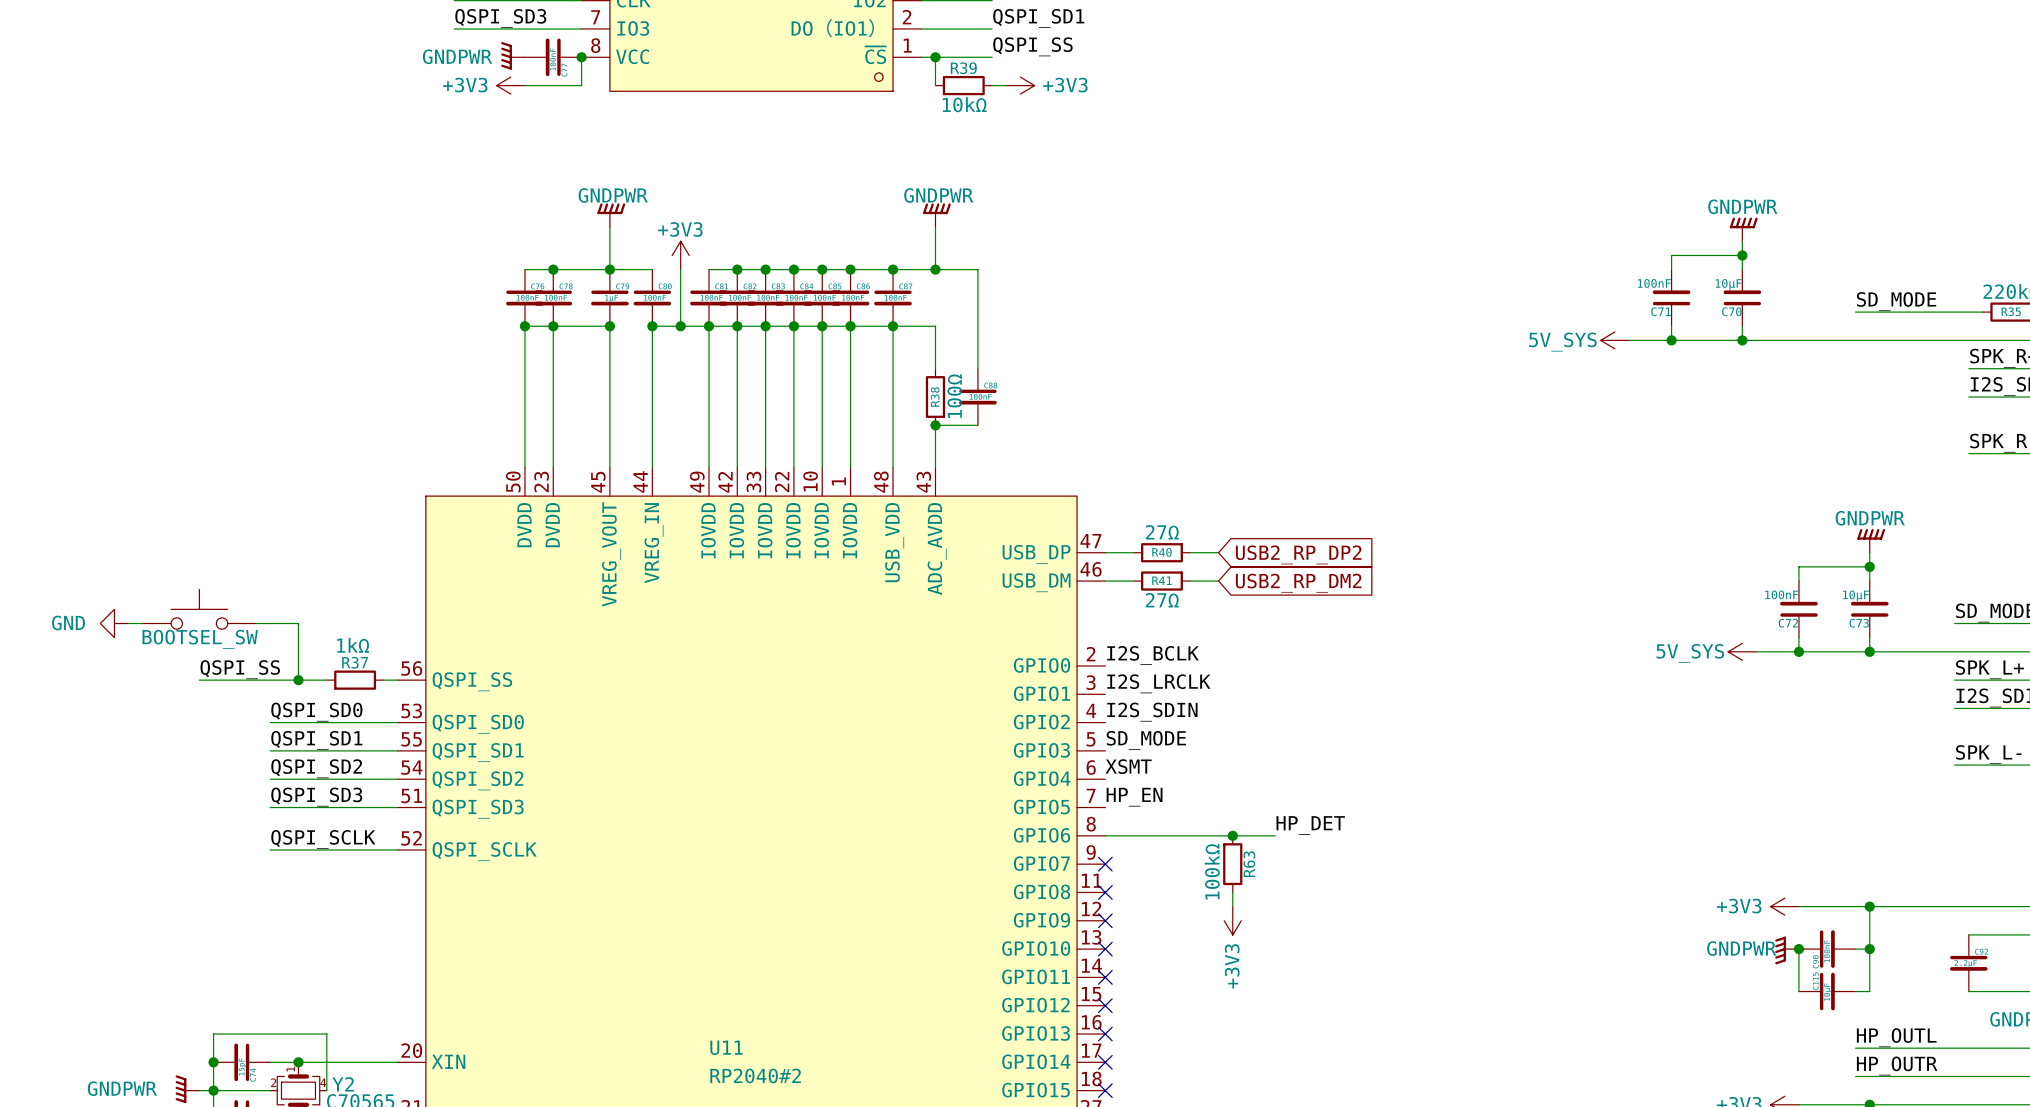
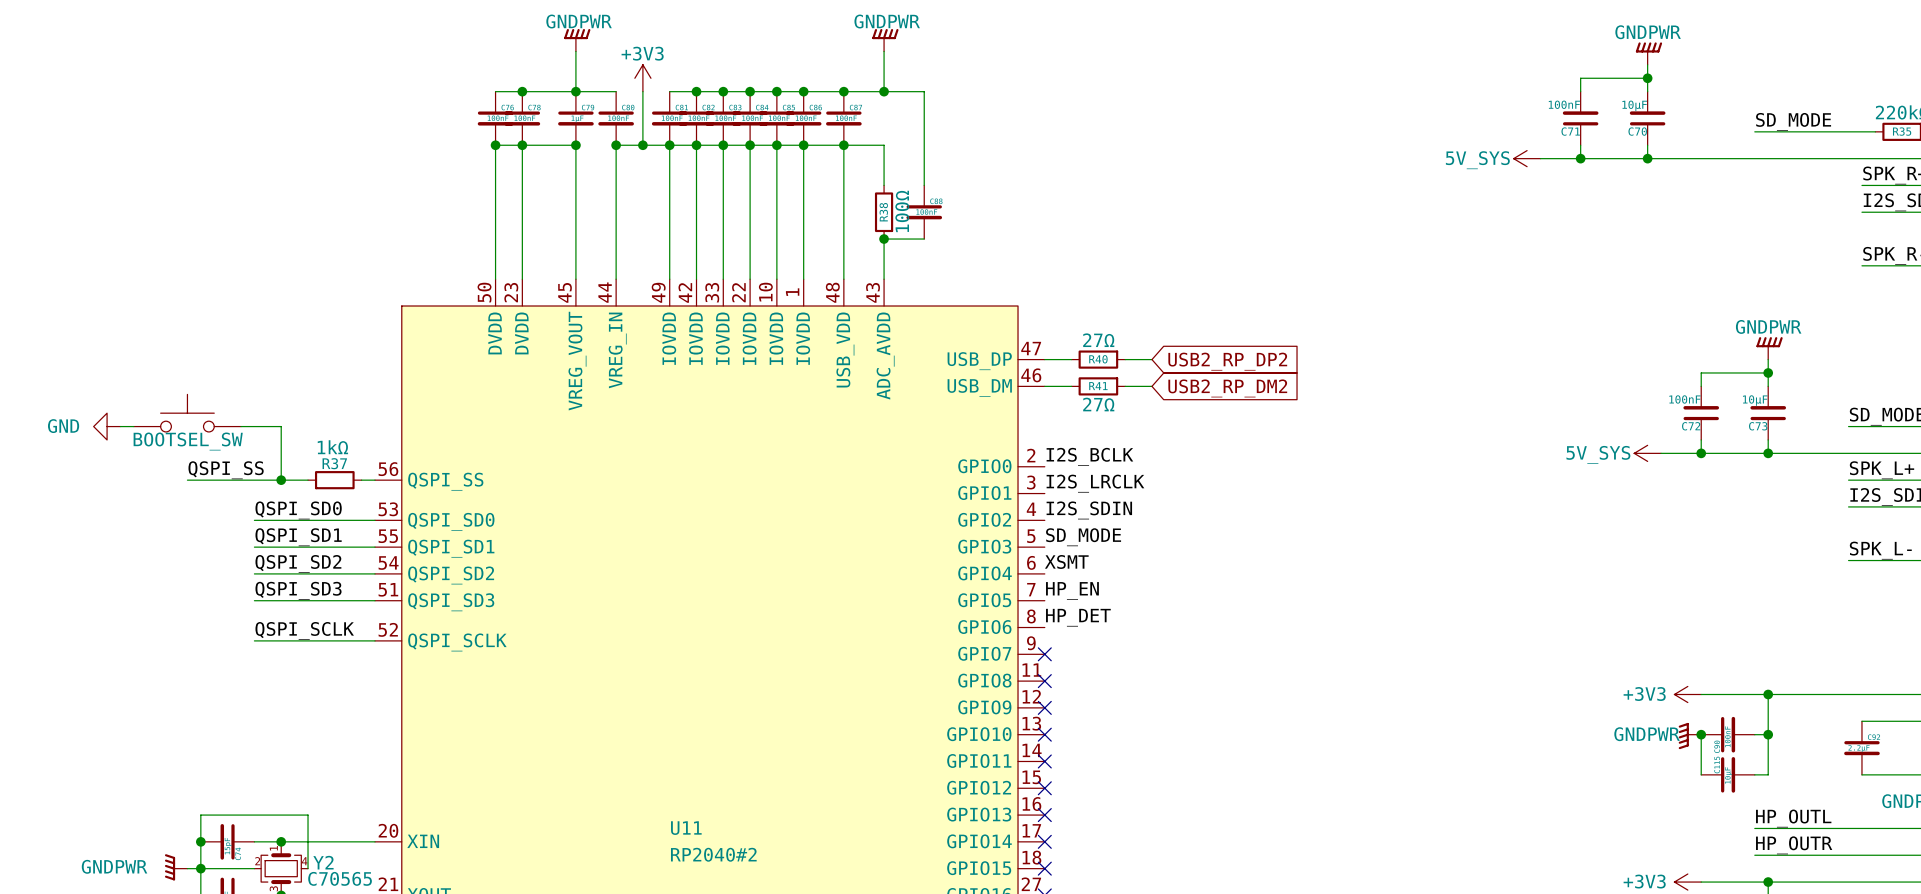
label position: HP_DET (1310, 825) -> HP_DET (1078, 617)
wire: (1105, 835) (1275, 835) -> none
junction: (1232, 835) -> none
R63: 100kΩ (1232, 864) -> none
wire: (1232, 892) (1232, 906) -> none
power symbol: +3V3 (1232, 920) -> none

